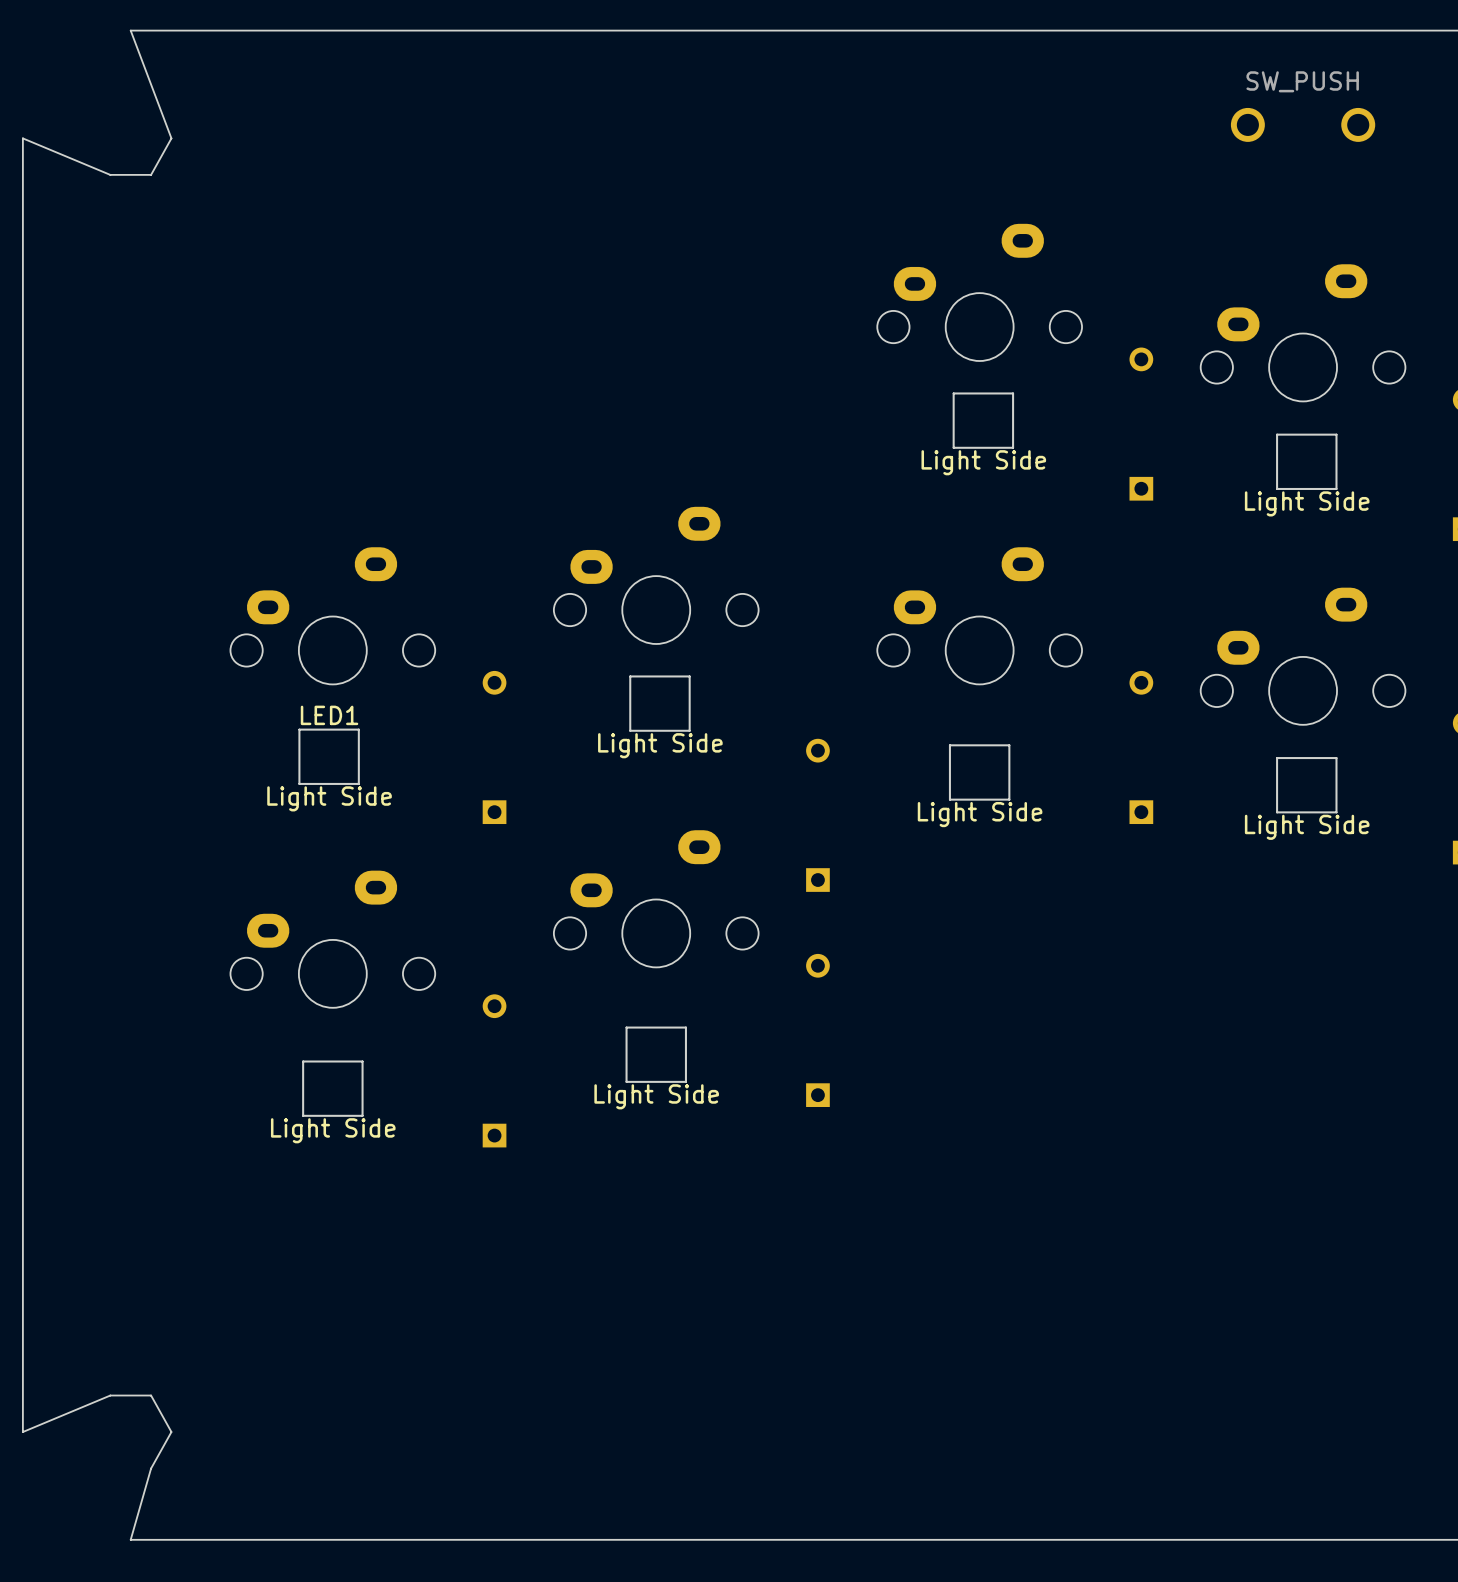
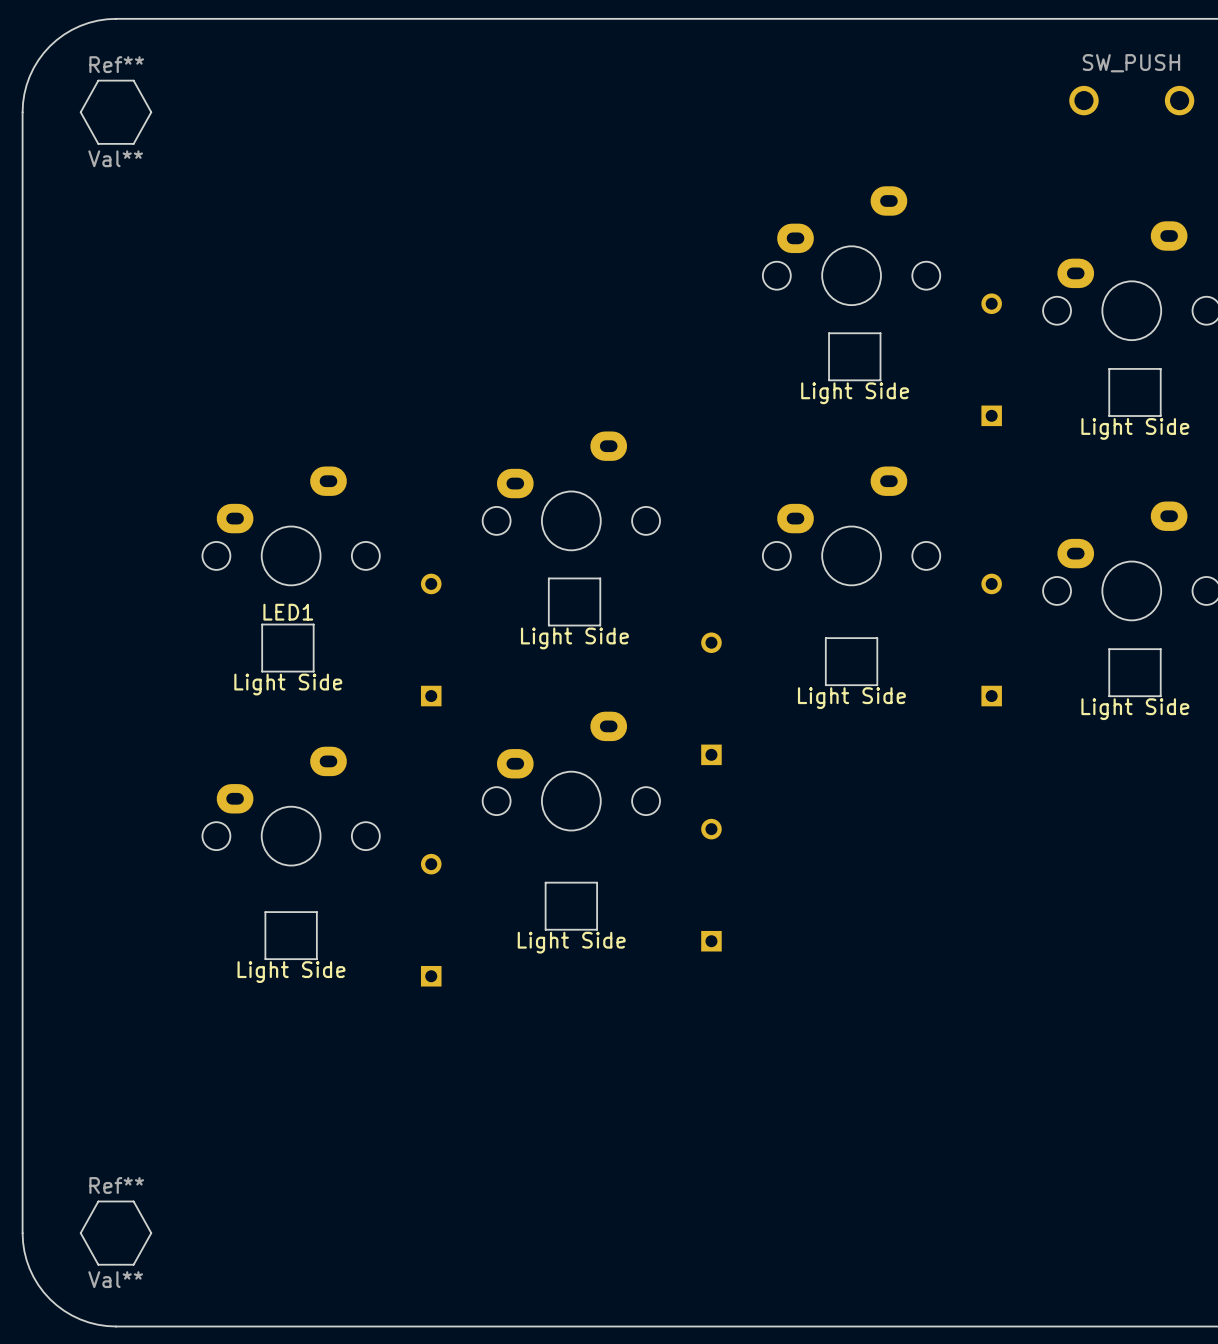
board edge: (130, 30) (171, 138) (151, 174) (110, 174) (22, 138) -> (116, 18) (97, 20) (80, 25) (64, 34) (49, 46) (38, 60) (29, 76) (24, 94) (22, 112)
Ref**: none -> Val** (116, 112)
board edge: (22, 1432) (110, 1395) (151, 1395) (171, 1432) (151, 1468) (130, 1539) -> (22, 1233) (24, 1251) (29, 1268) (38, 1285) (49, 1299) (64, 1310) (80, 1319) (97, 1324) (116, 1326)
Ref**: none -> Val** (116, 1233)

